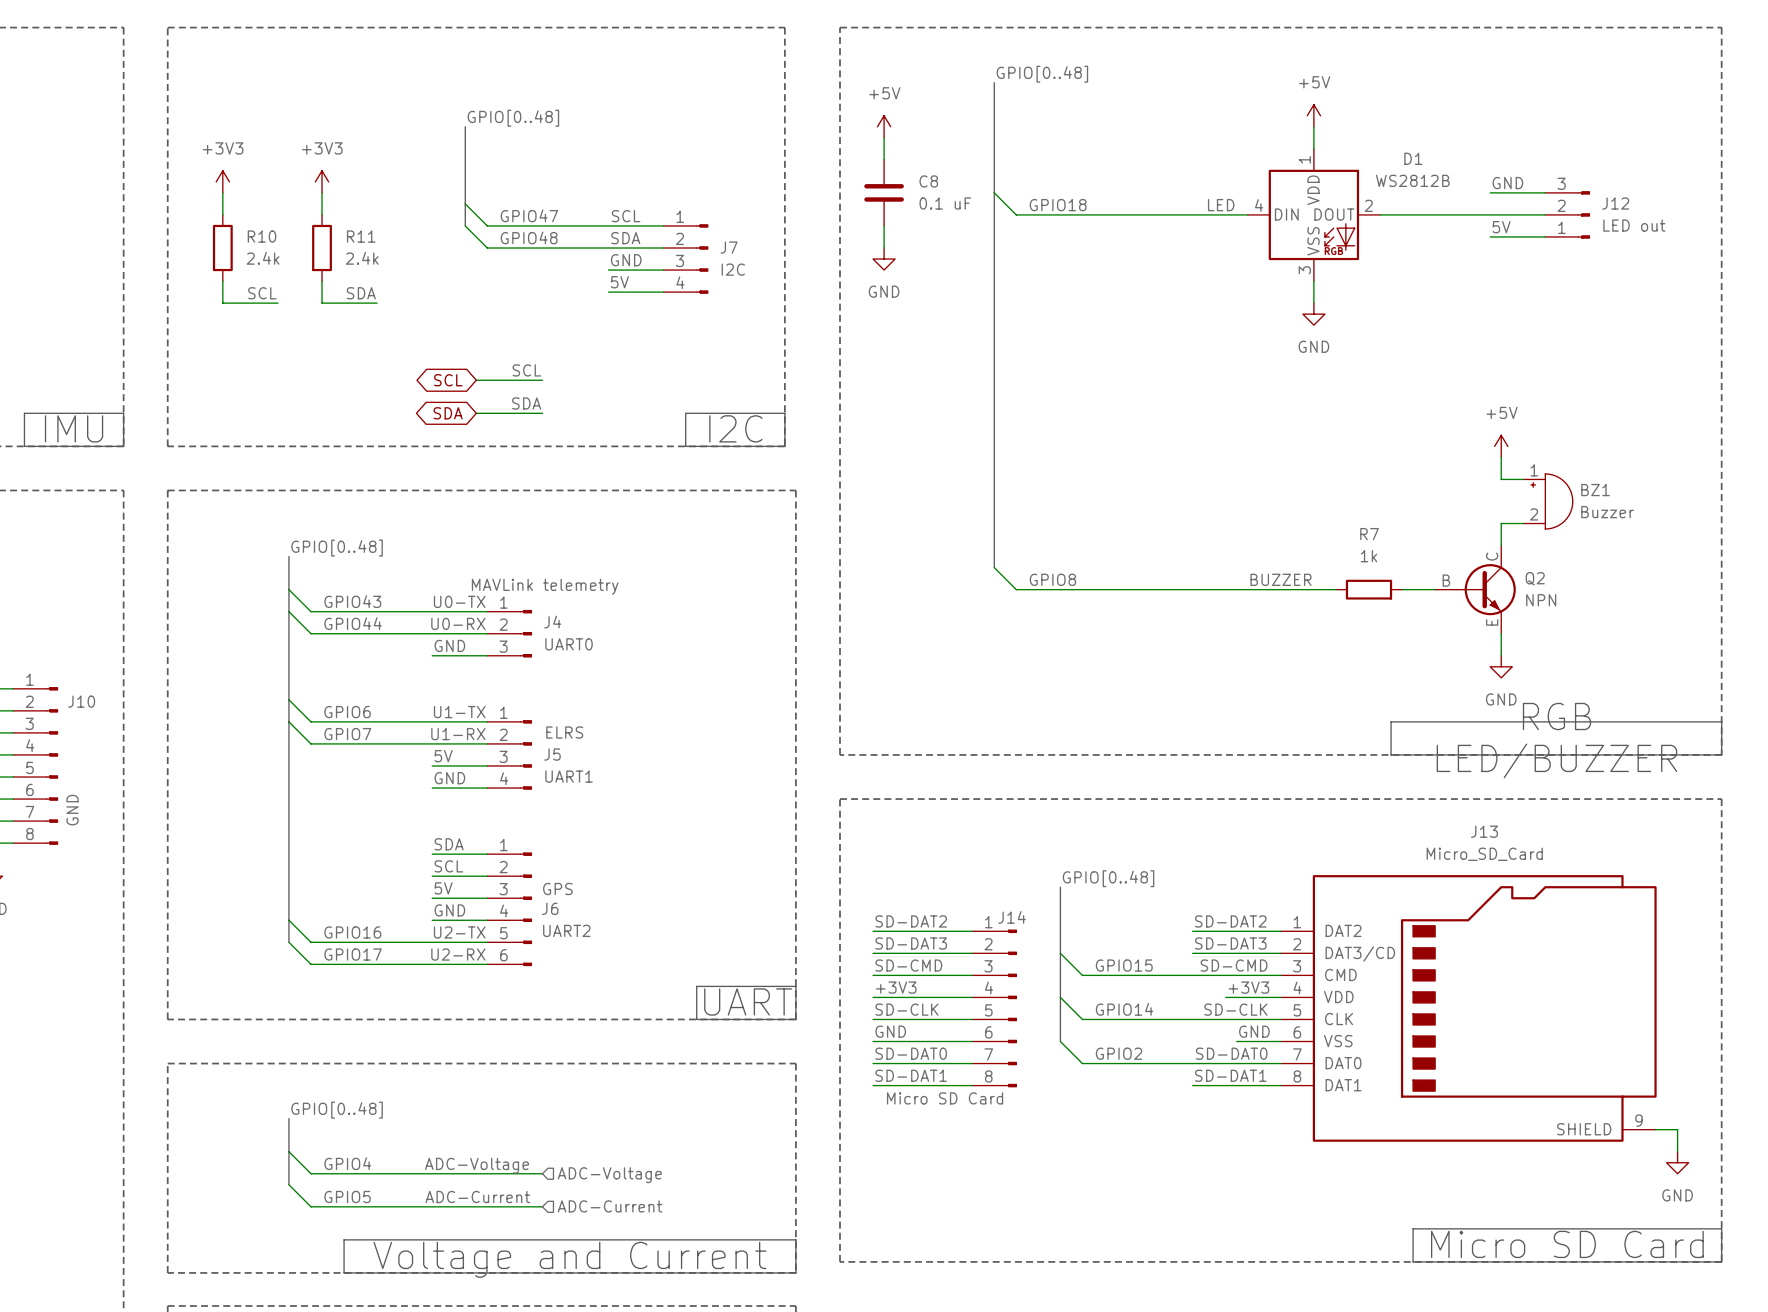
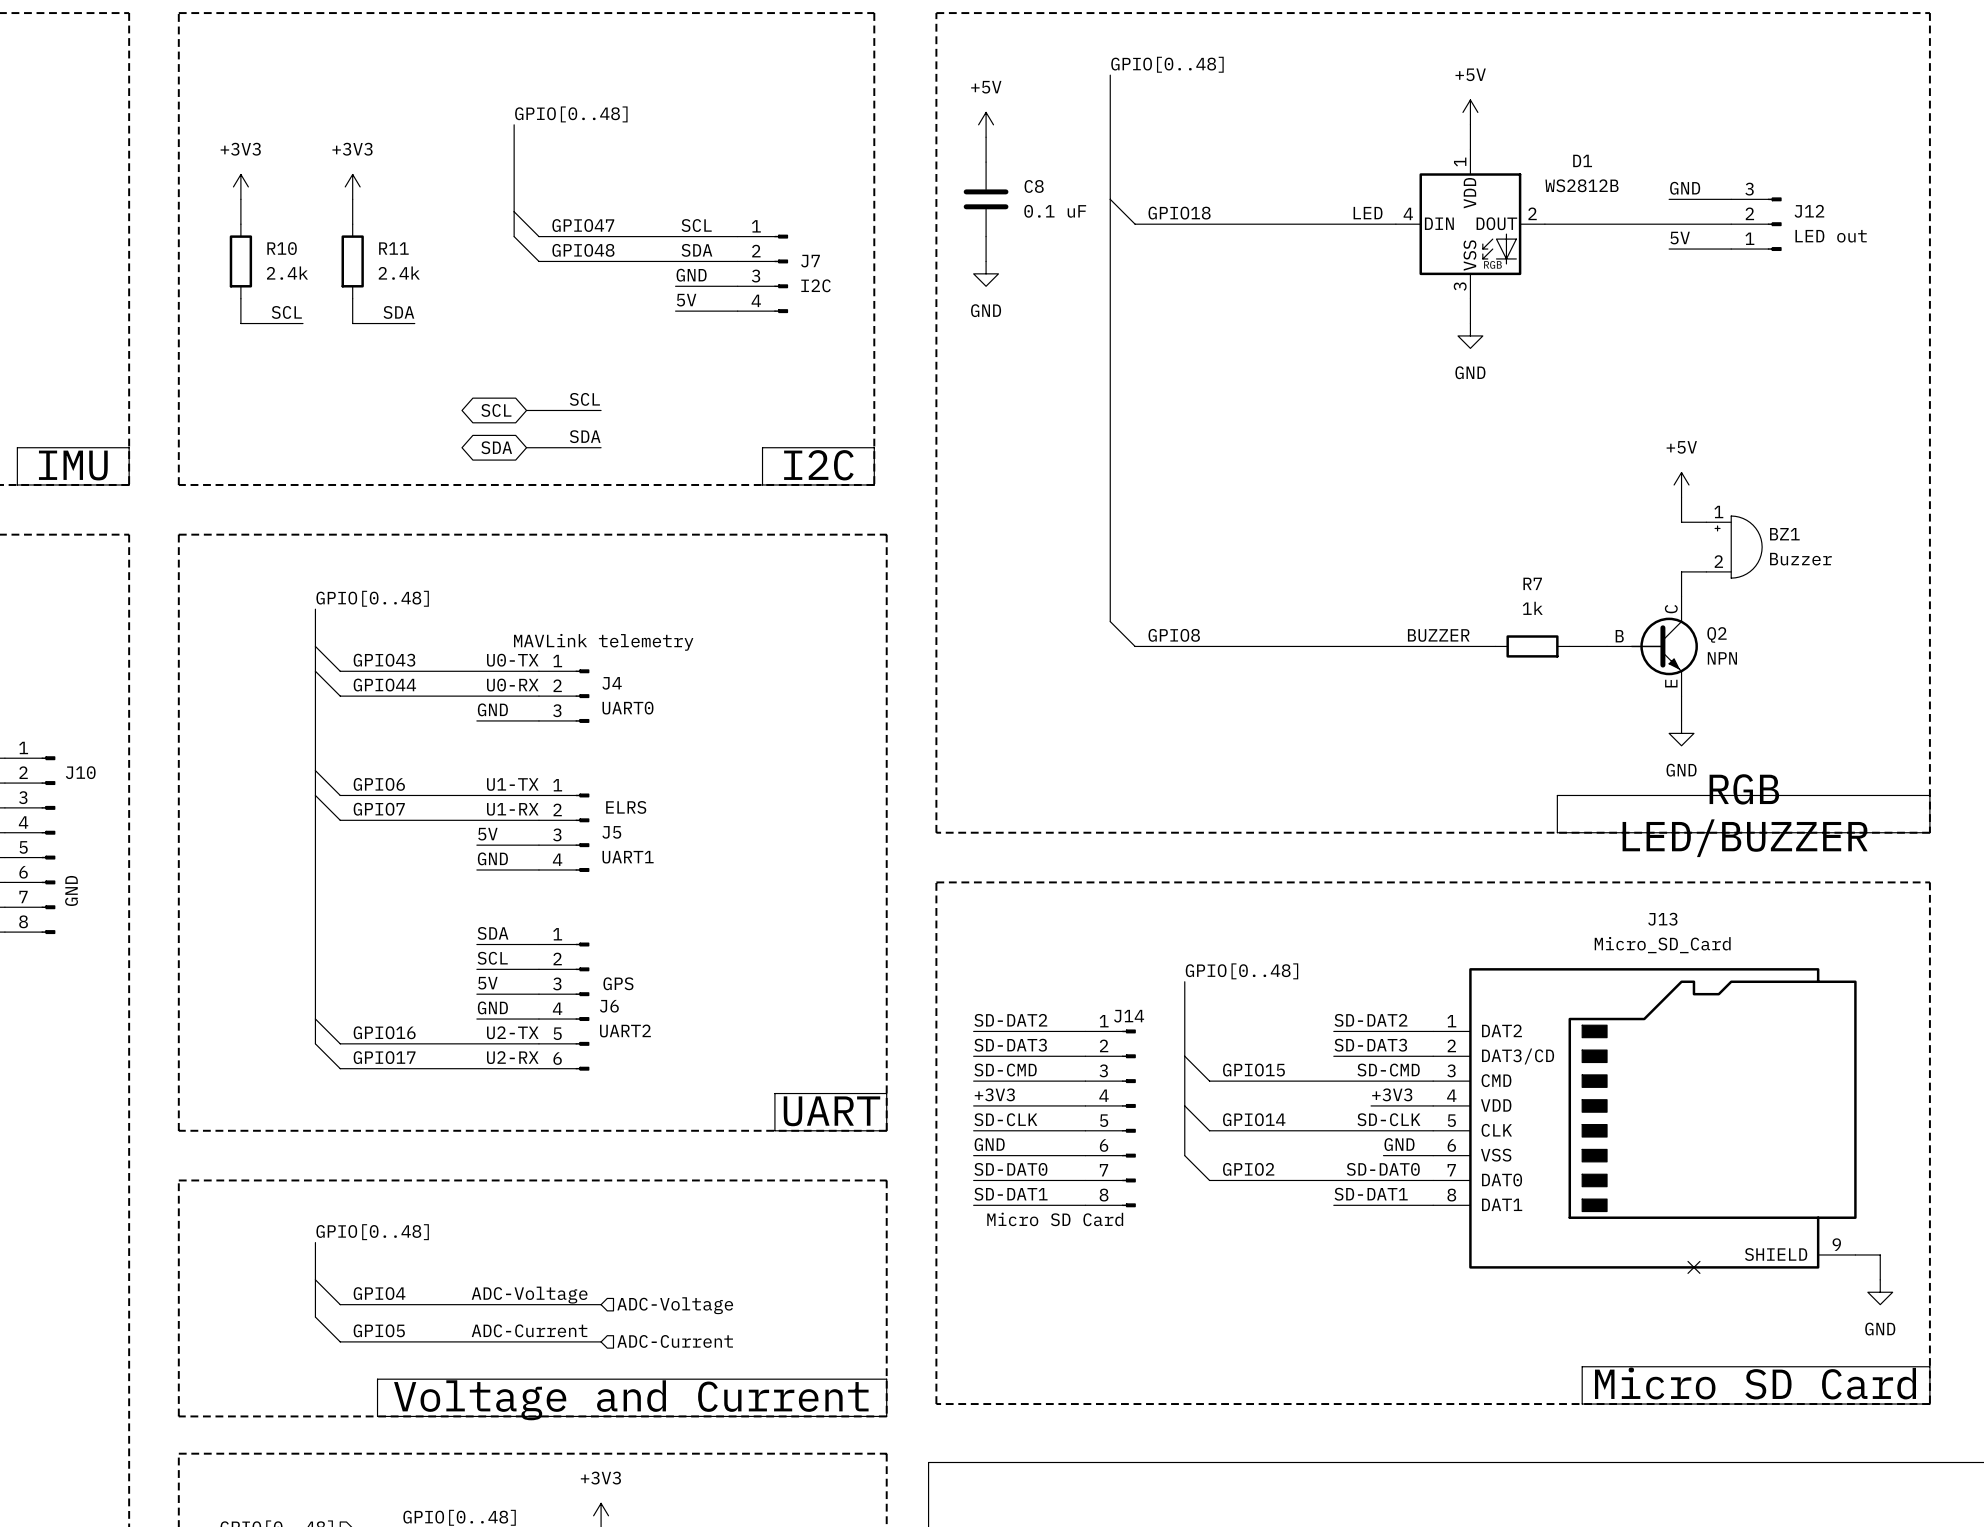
no-connect mark: none -> (1693, 1267)

